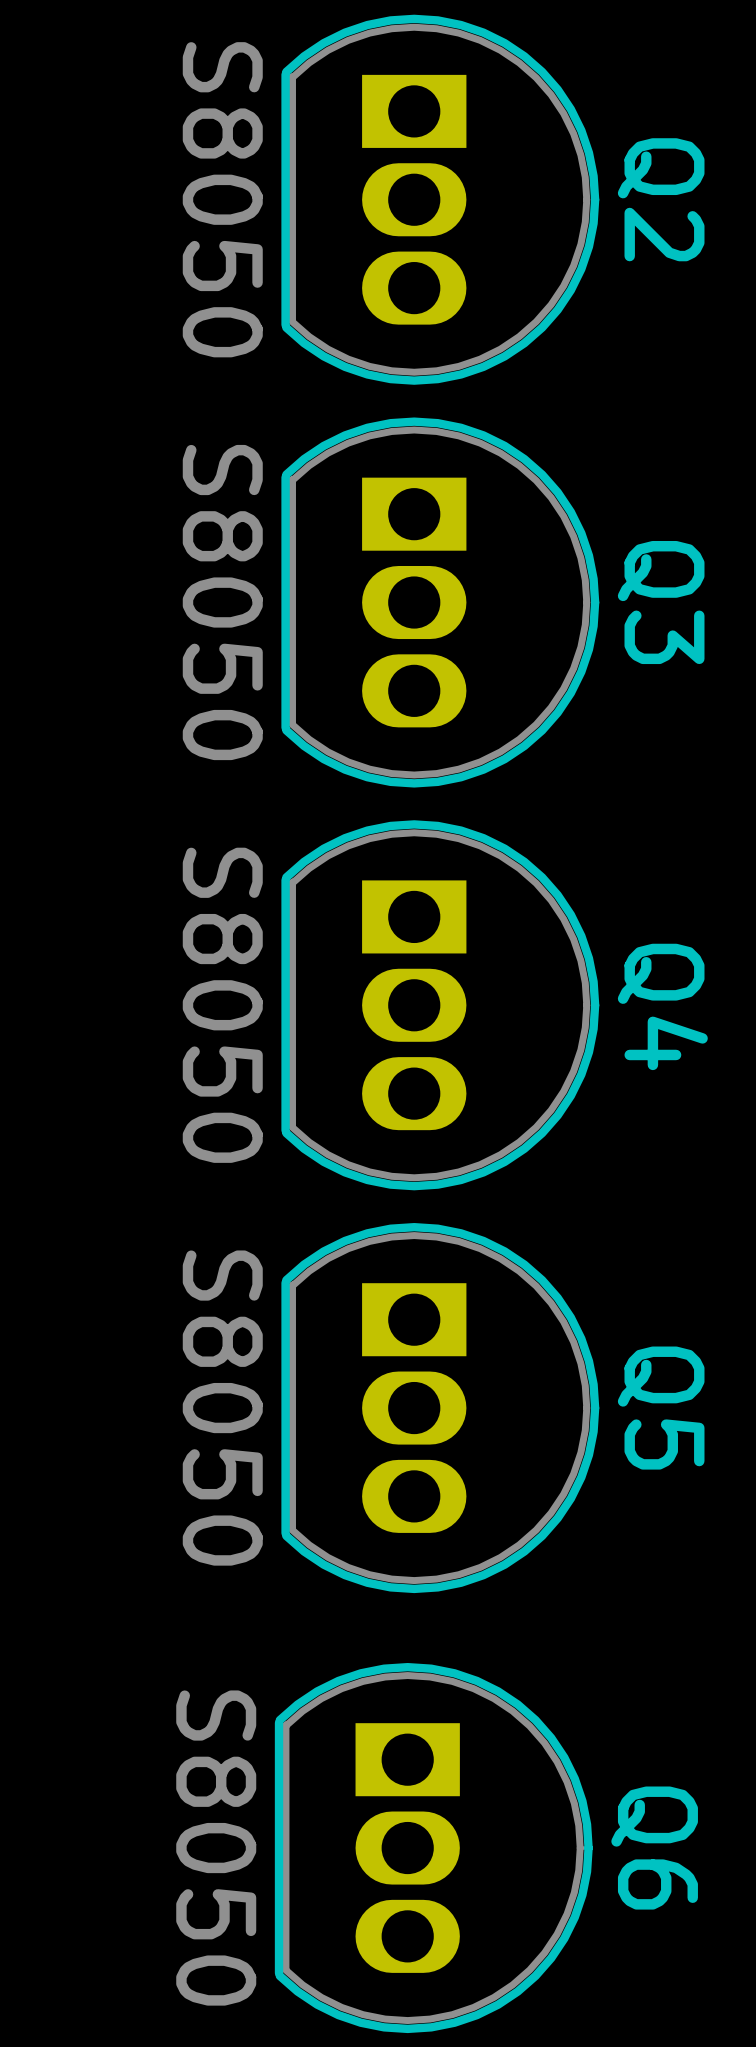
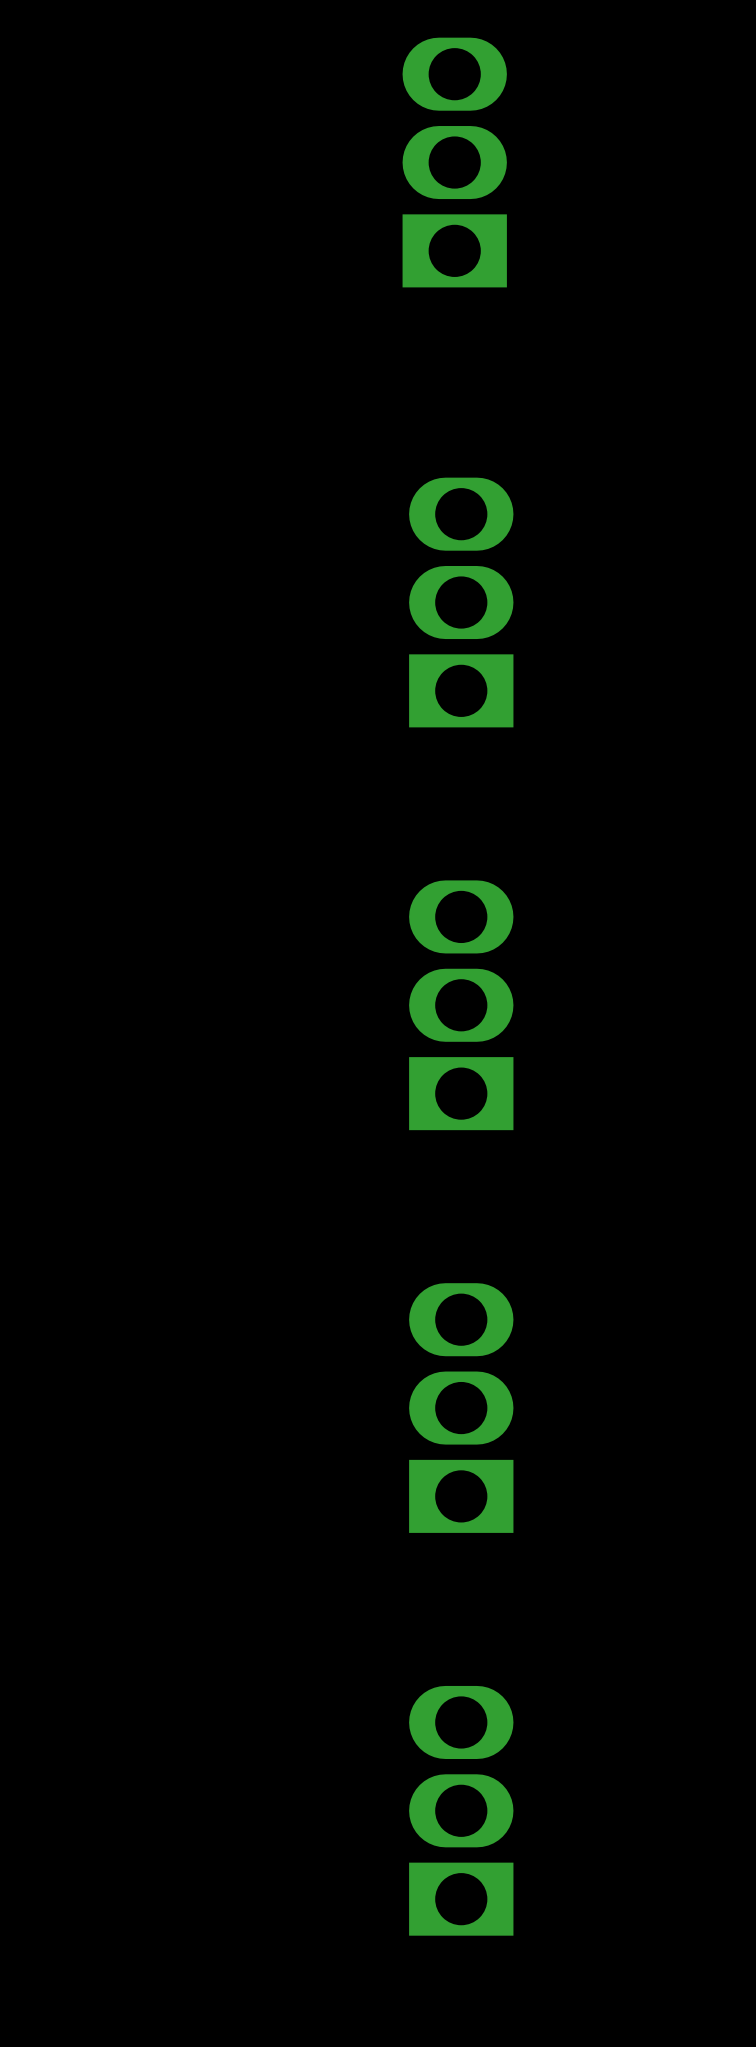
Q2 side: bottom (440, 199) -> top (461, 1810)
Q3 side: bottom (440, 602) -> top (461, 1408)
Q4 side: bottom (440, 1005) -> top (461, 1005)
Q5 side: bottom (440, 1408) -> top (461, 602)
Q6 side: bottom (433, 1848) -> top (454, 162)

